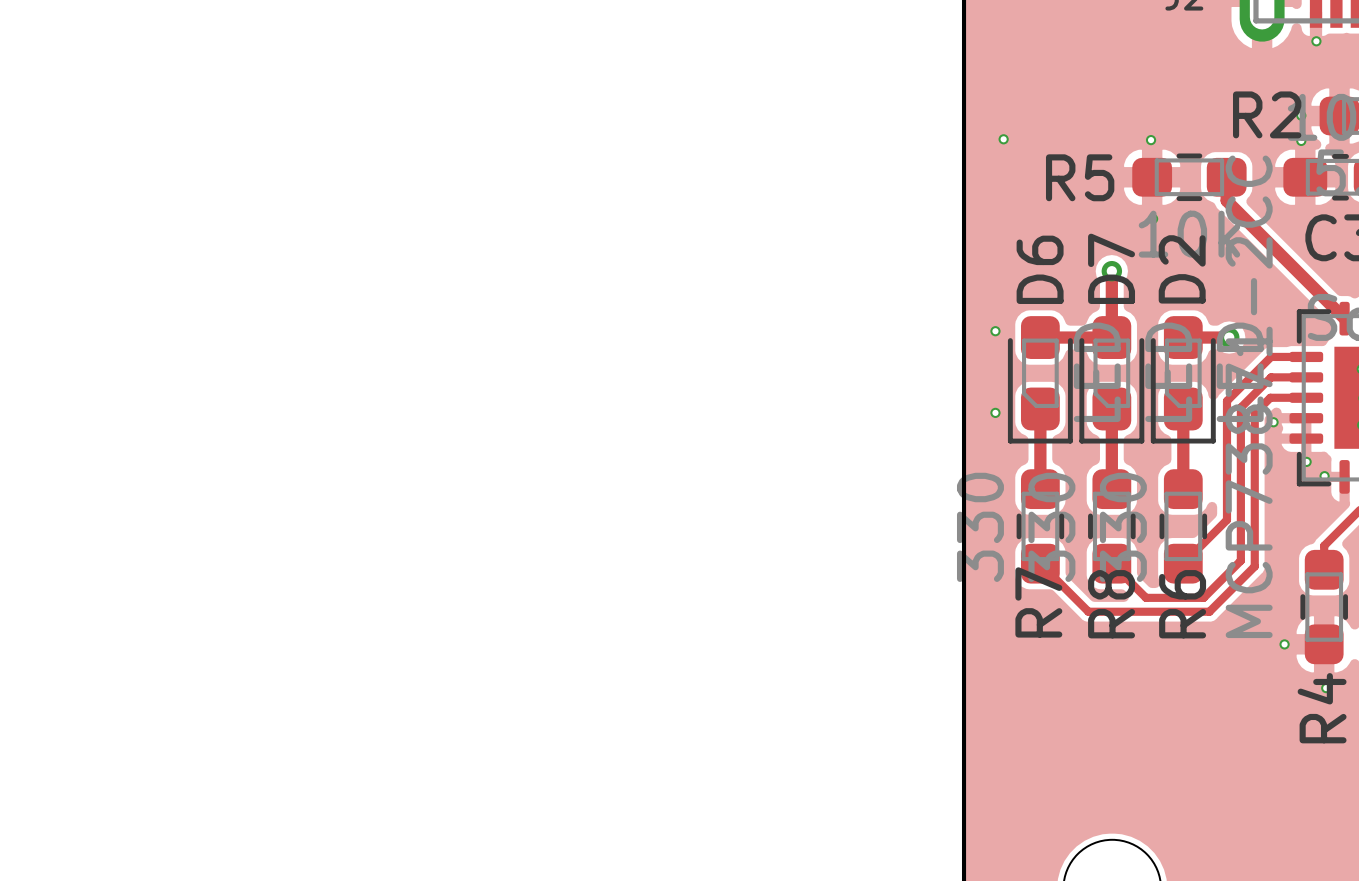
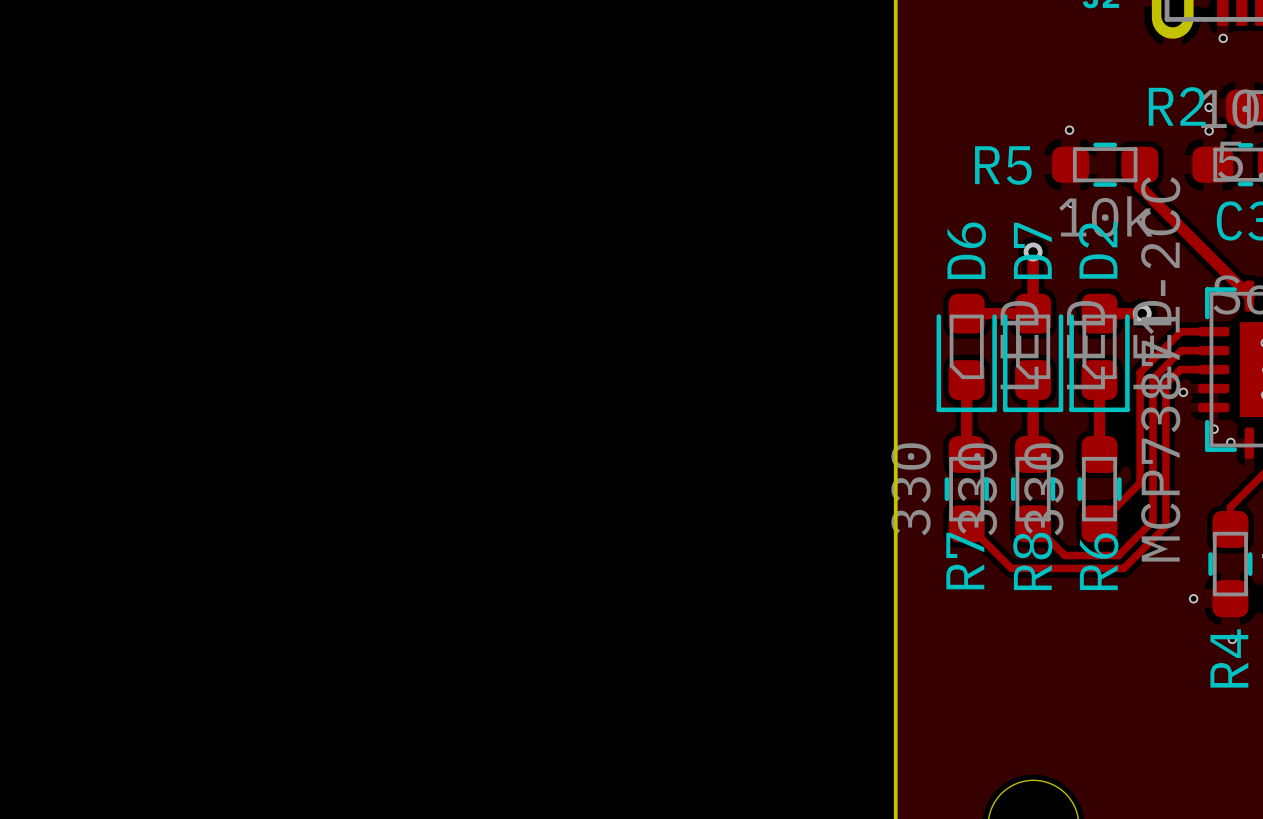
via: (1003, 139) -> none
via: (995, 331) -> none
via: (995, 412) -> none

